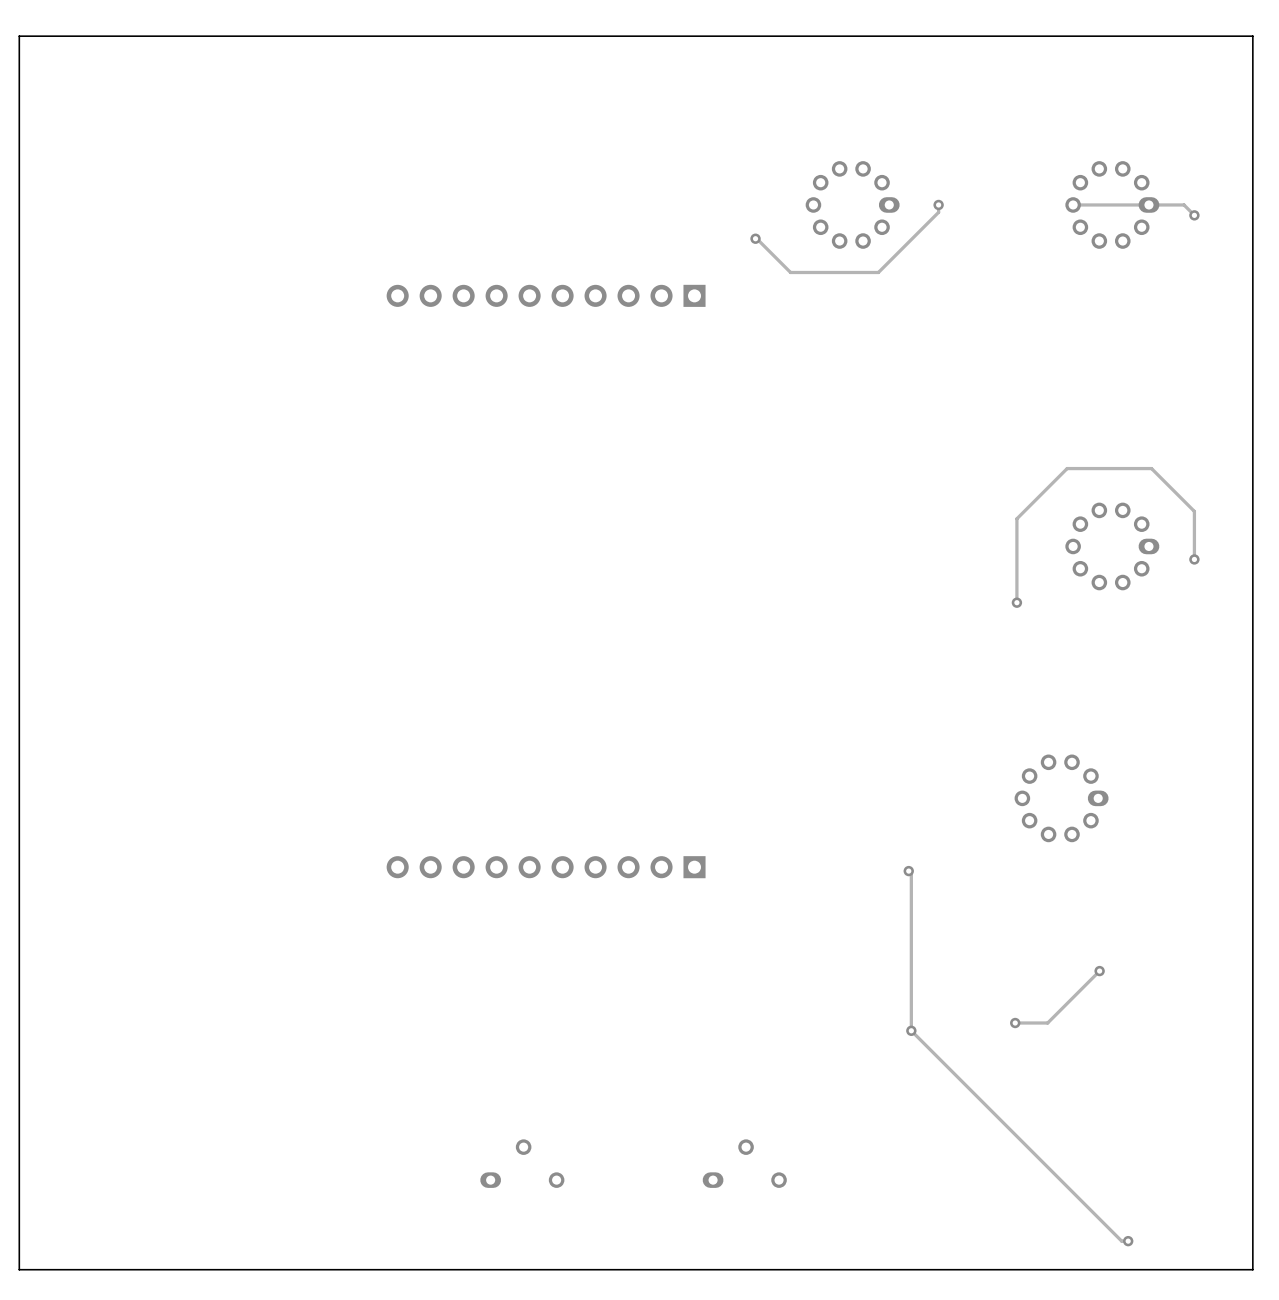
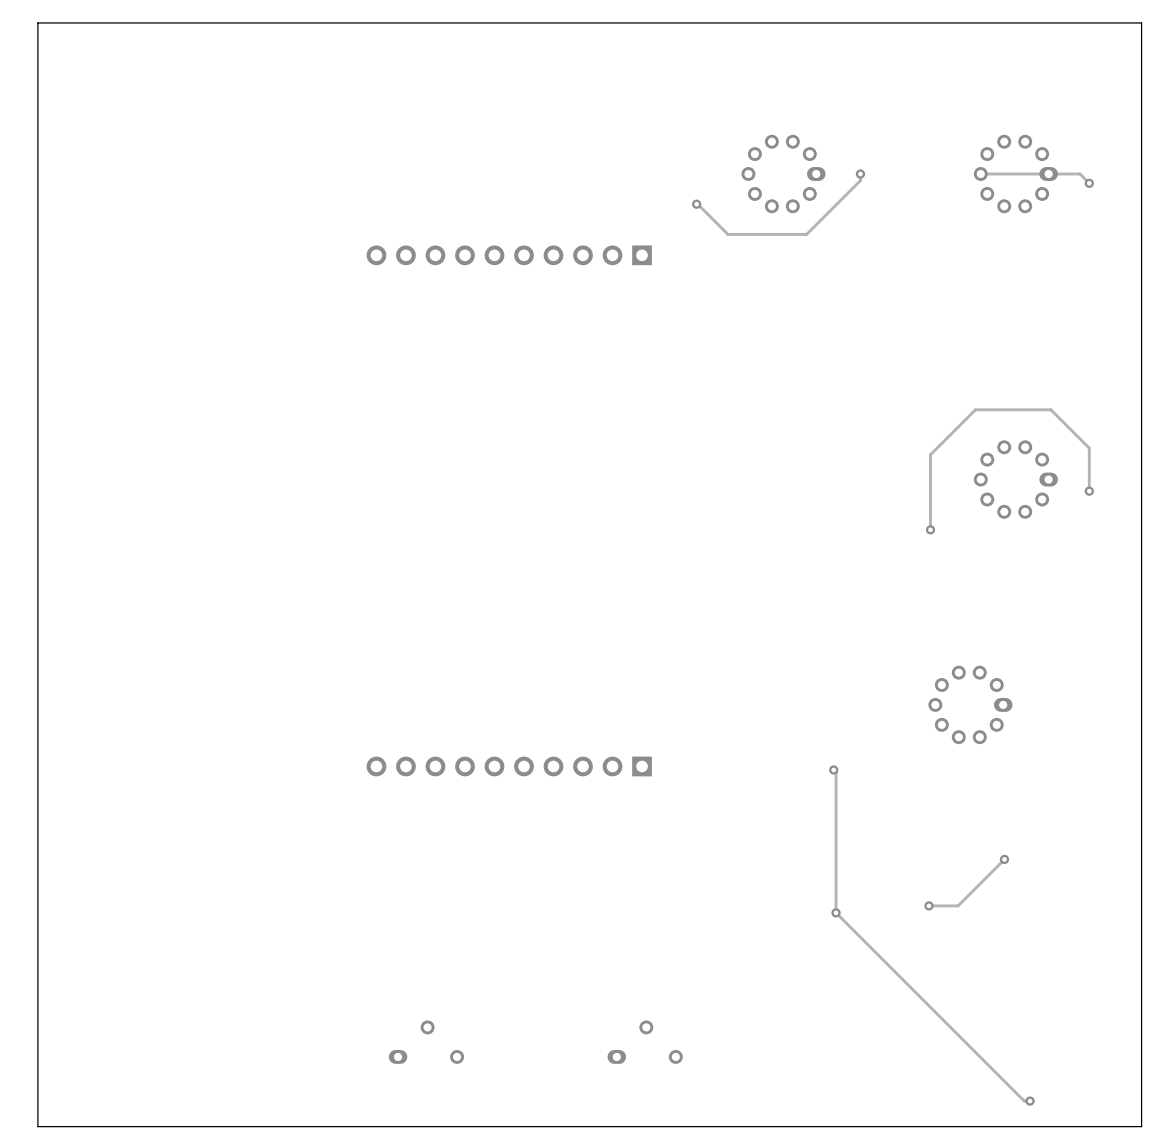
part position: (522, 1163) -> (426, 1042)
part position: (744, 1163) -> (645, 1042)

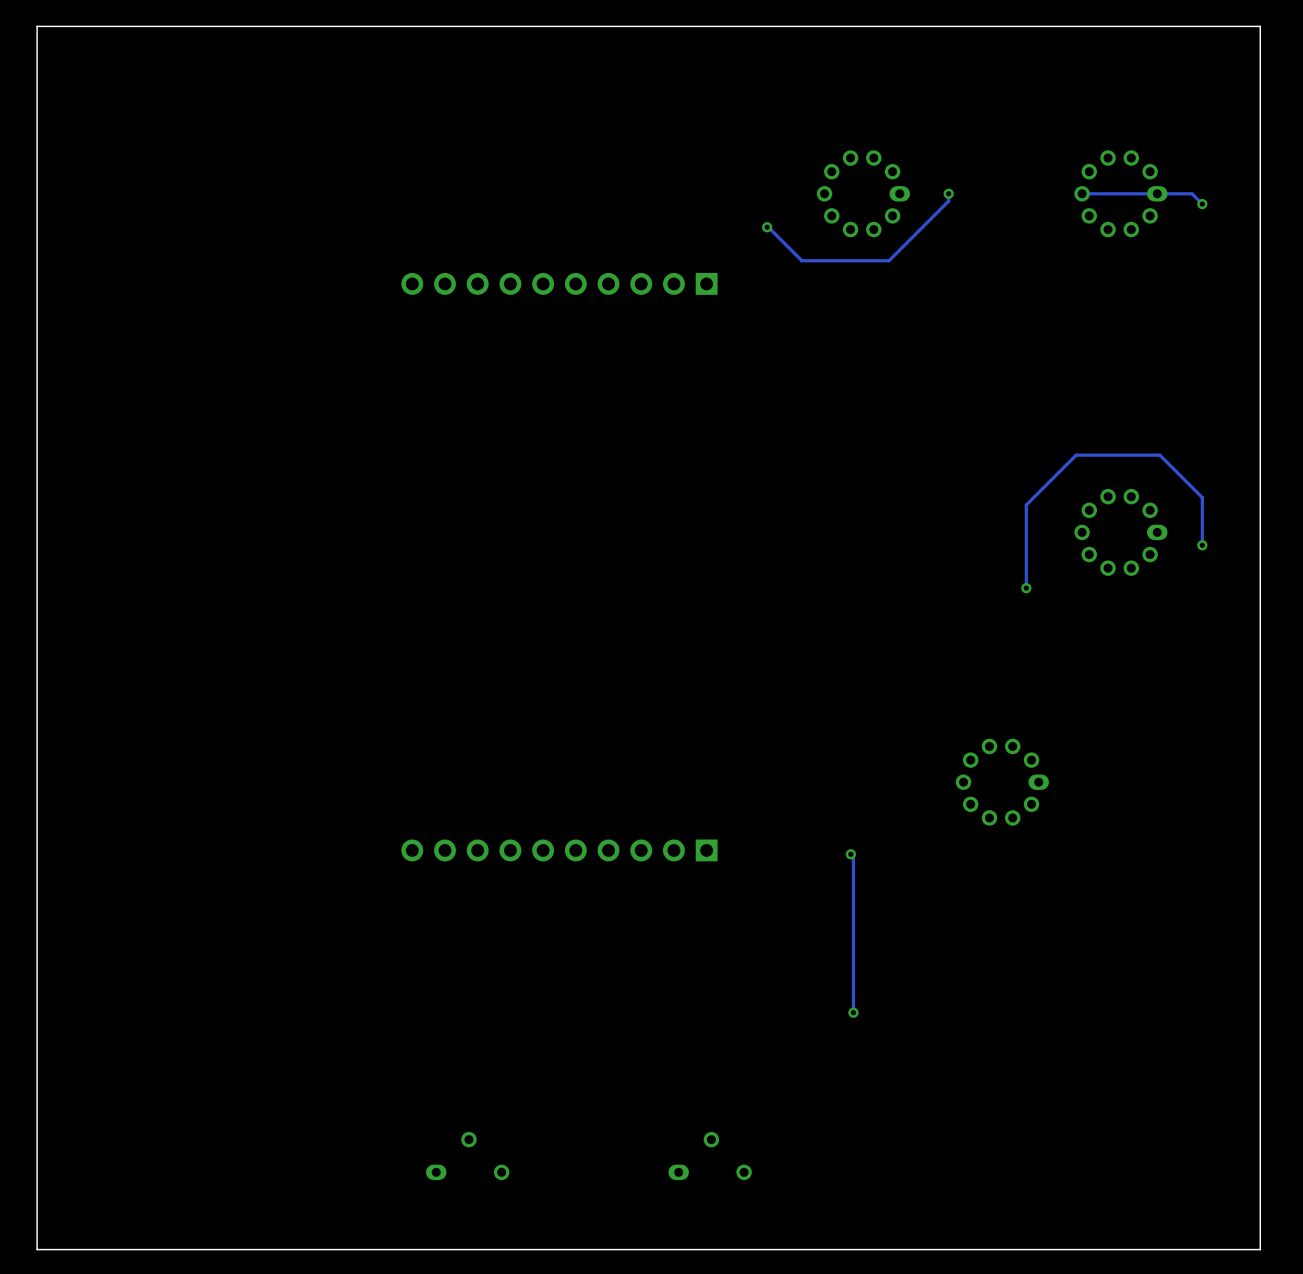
part position: (970, 704) -> (1002, 782)
track: none -> (850, 854) (853, 856) (853, 1012)
track: (833, 769) (836, 772) (836, 912) (1024, 1101) (1030, 1101) -> none
via position: (833, 769) -> (850, 854)
track: (1004, 859) (958, 905) (928, 905) -> none
via: (1004, 859) -> none
via: (928, 905) -> none
via position: (836, 912) -> (853, 1012)
via: (1030, 1101) -> none

